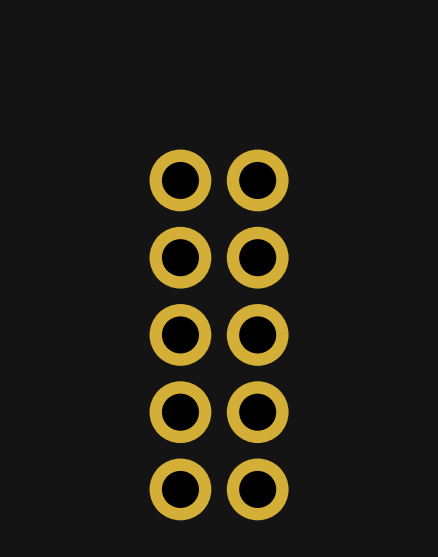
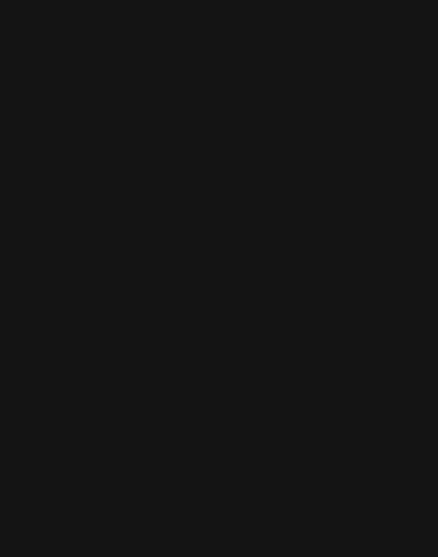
part: (219, 334) -> none

